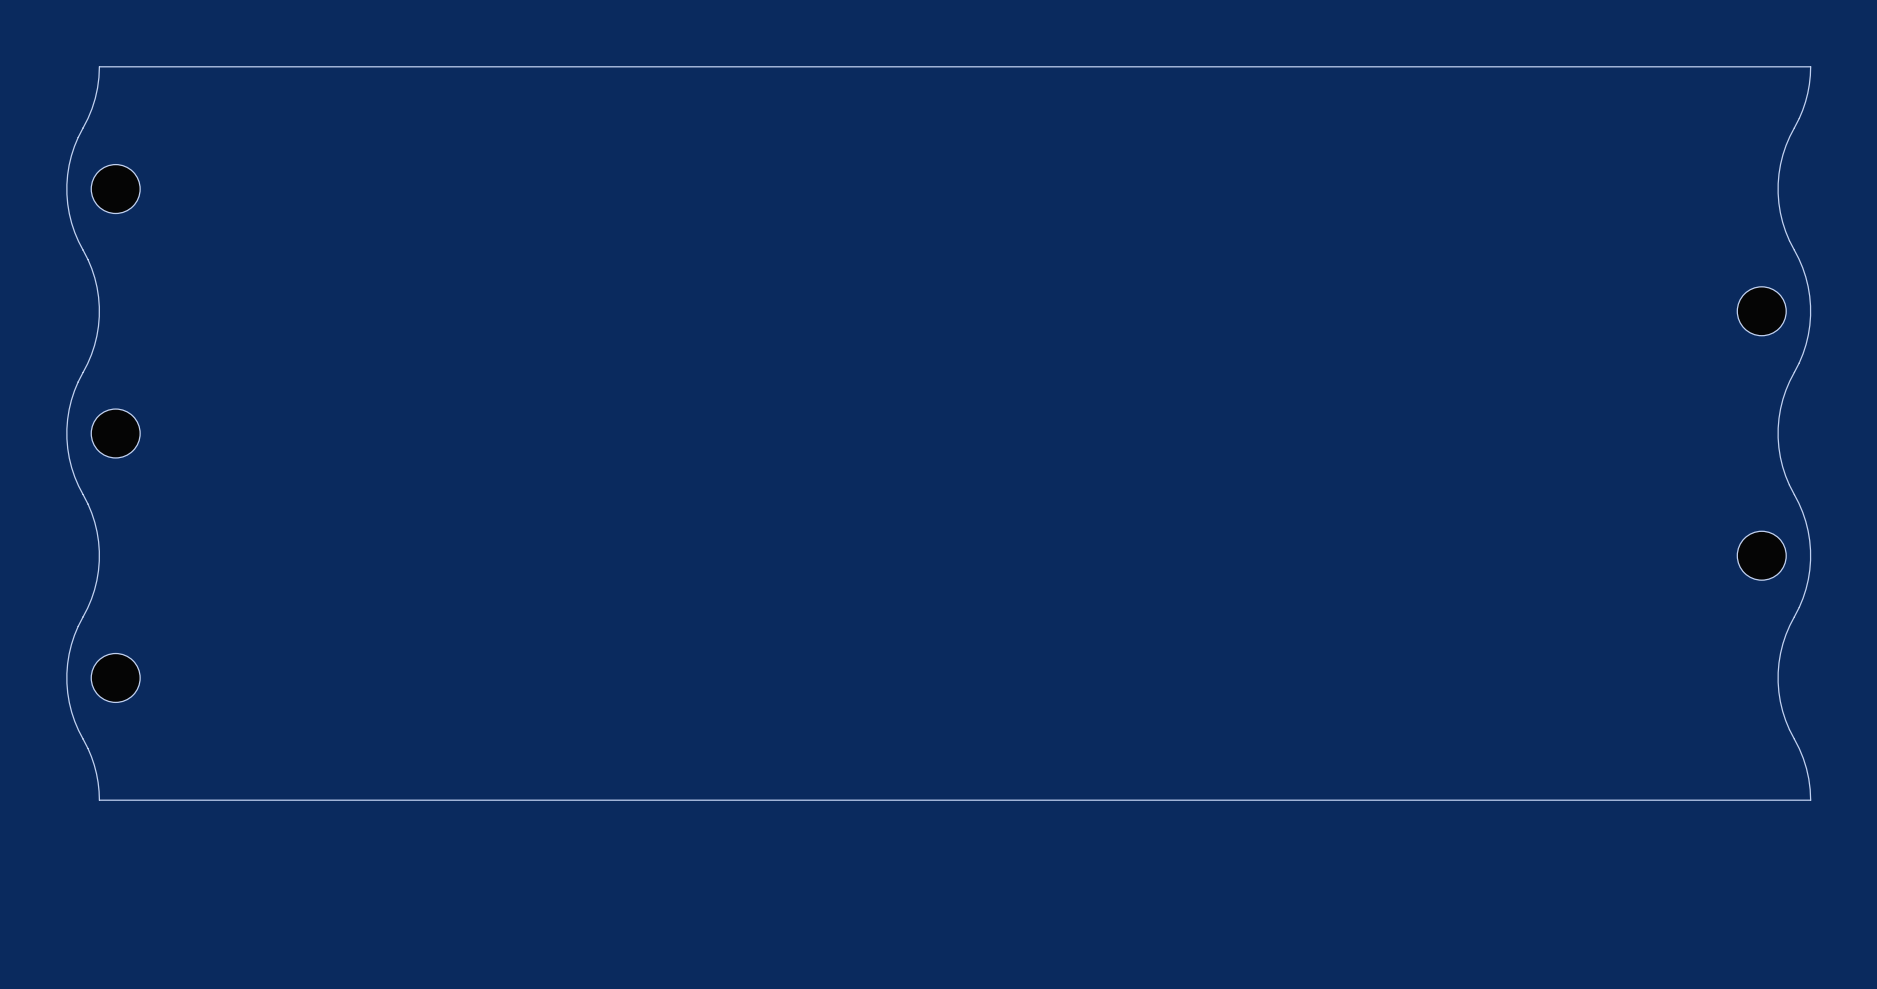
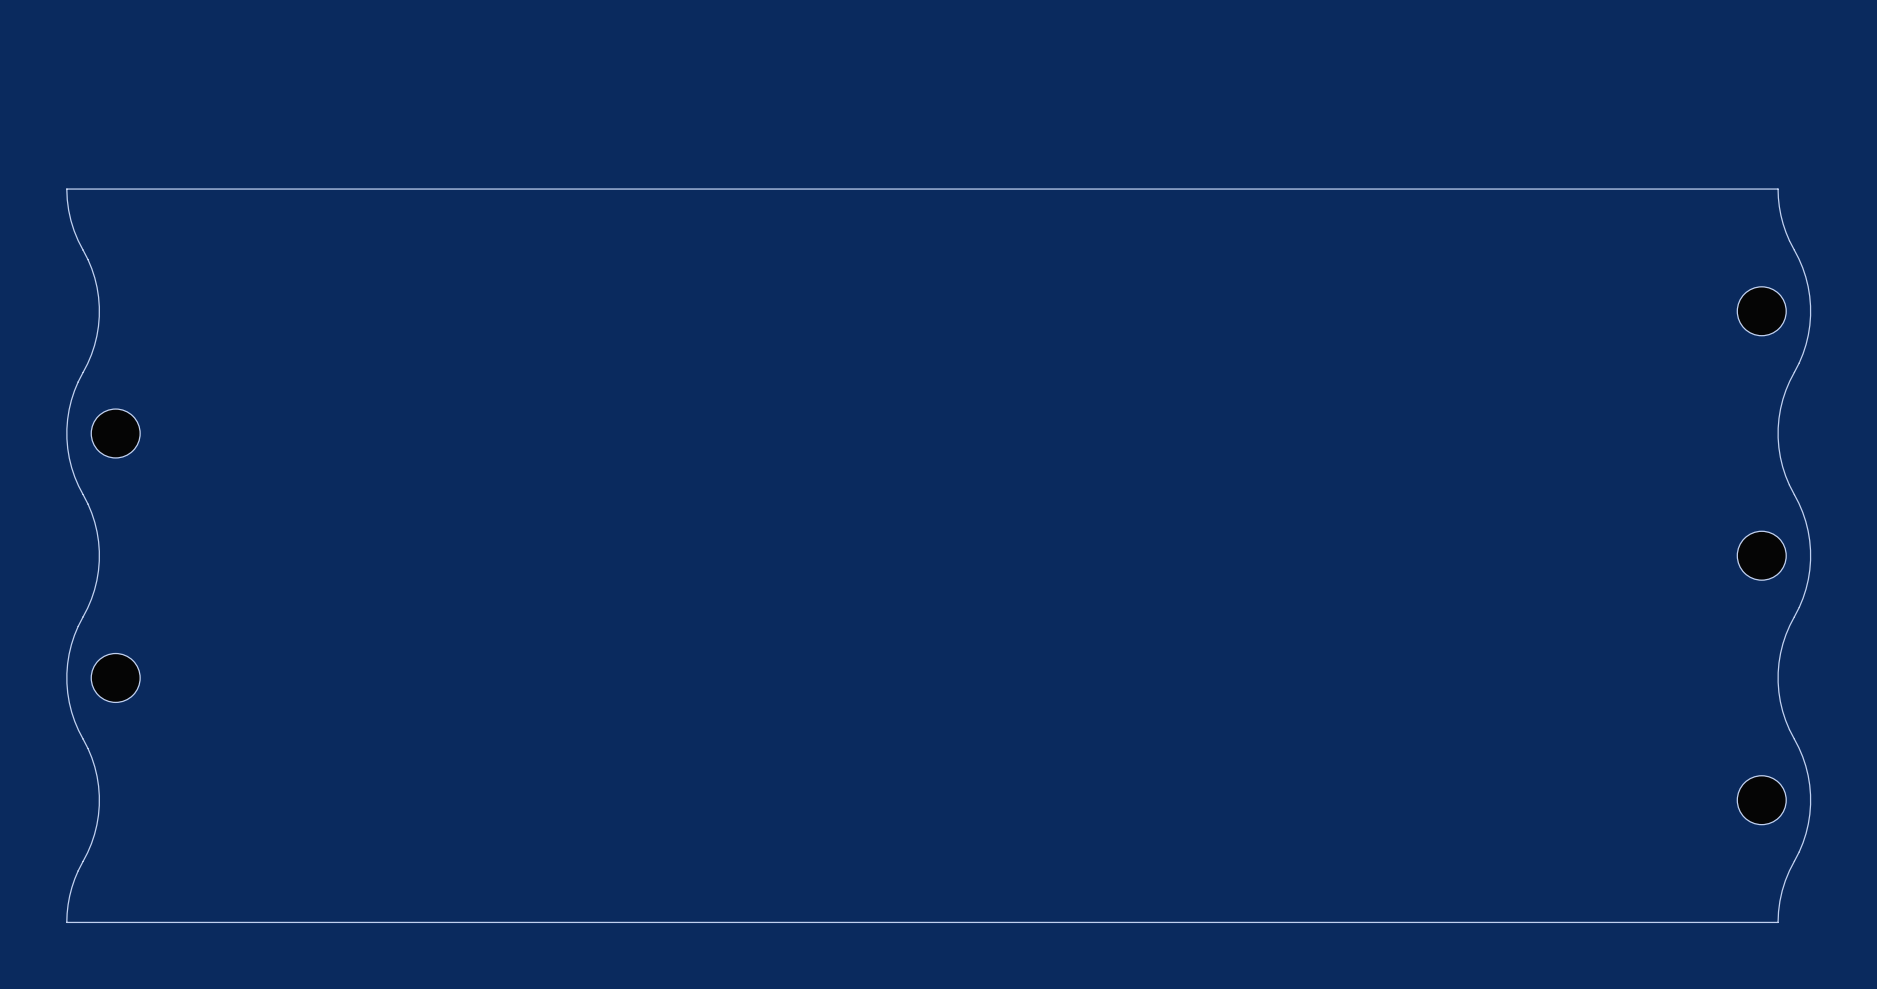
hole: (115, 189) -> none
board edge: (1789, 240) (1780, 212) (1778, 193) (1778, 173) (1786, 145) (1805, 101) (1810, 66) (99, 66) (95, 98) (74, 146) (67, 174) (66, 194) (69, 213) (74, 232) (83, 250) -> (1789, 240) (1780, 215) (1778, 189) (66, 189) (70, 220) (83, 250)
board edge: (1794, 739) (1806, 768) (1810, 800) (99, 800) (96, 773) (88, 748) -> (1794, 739) (1802, 756) (1808, 775) (1810, 794) (1809, 814) (1803, 842) (1782, 890) (1778, 922) (66, 922) (71, 887) (91, 843) (98, 815) (99, 795) (97, 776) (88, 748)
hole: none -> (1761, 800)

